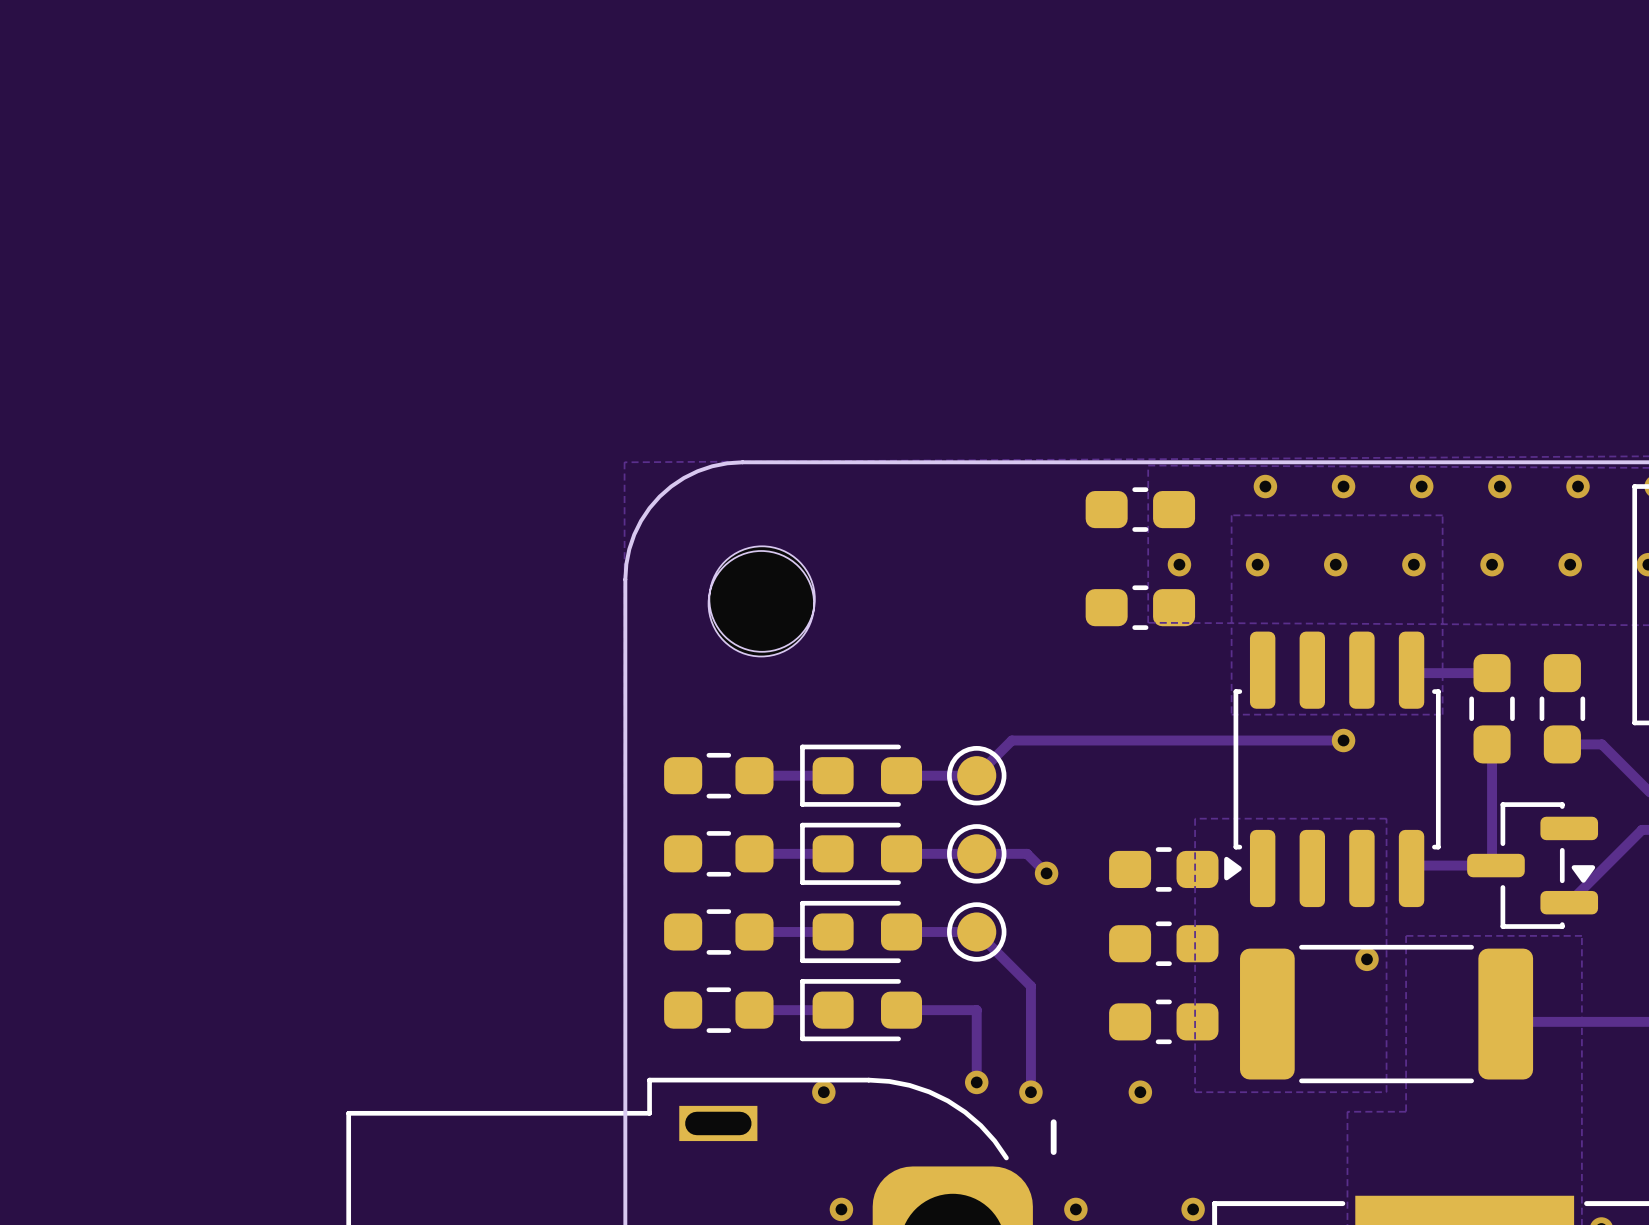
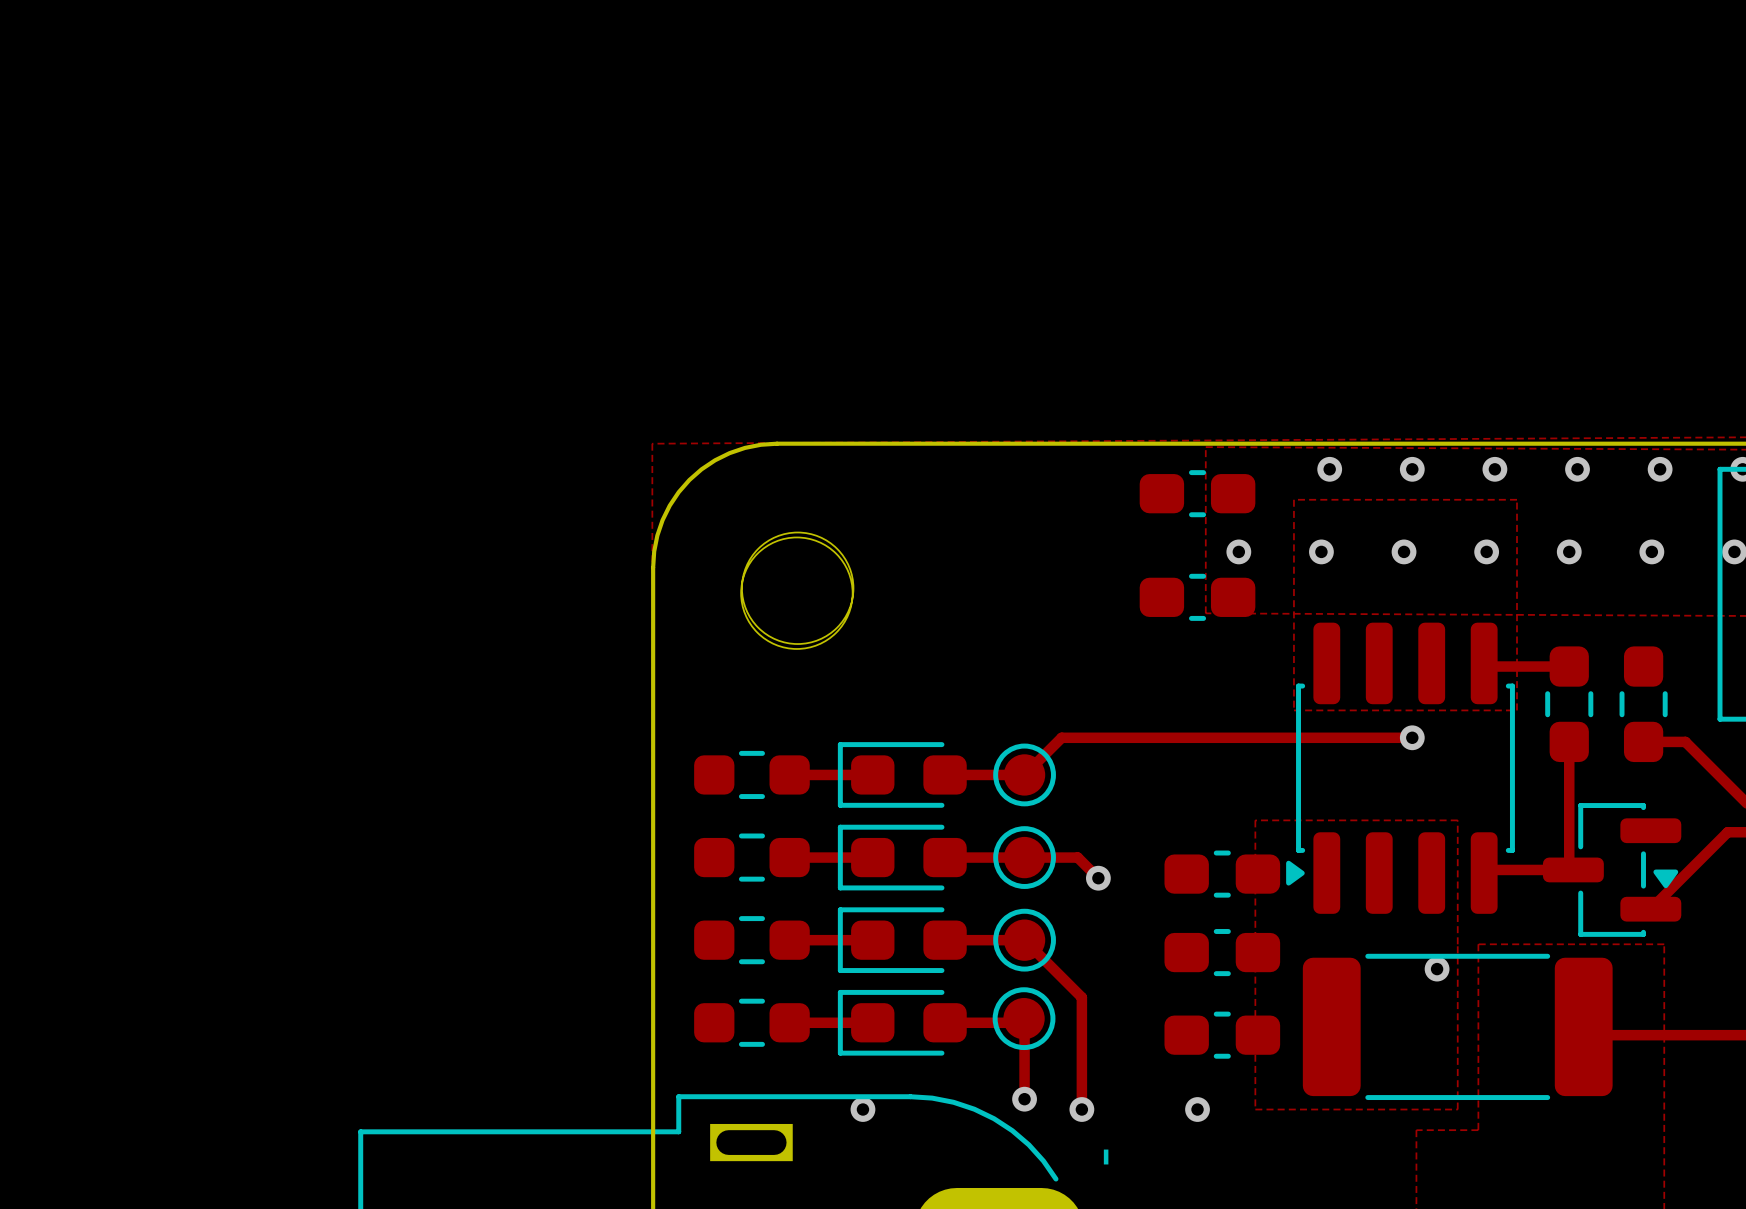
part: none -> (1024, 1018)

